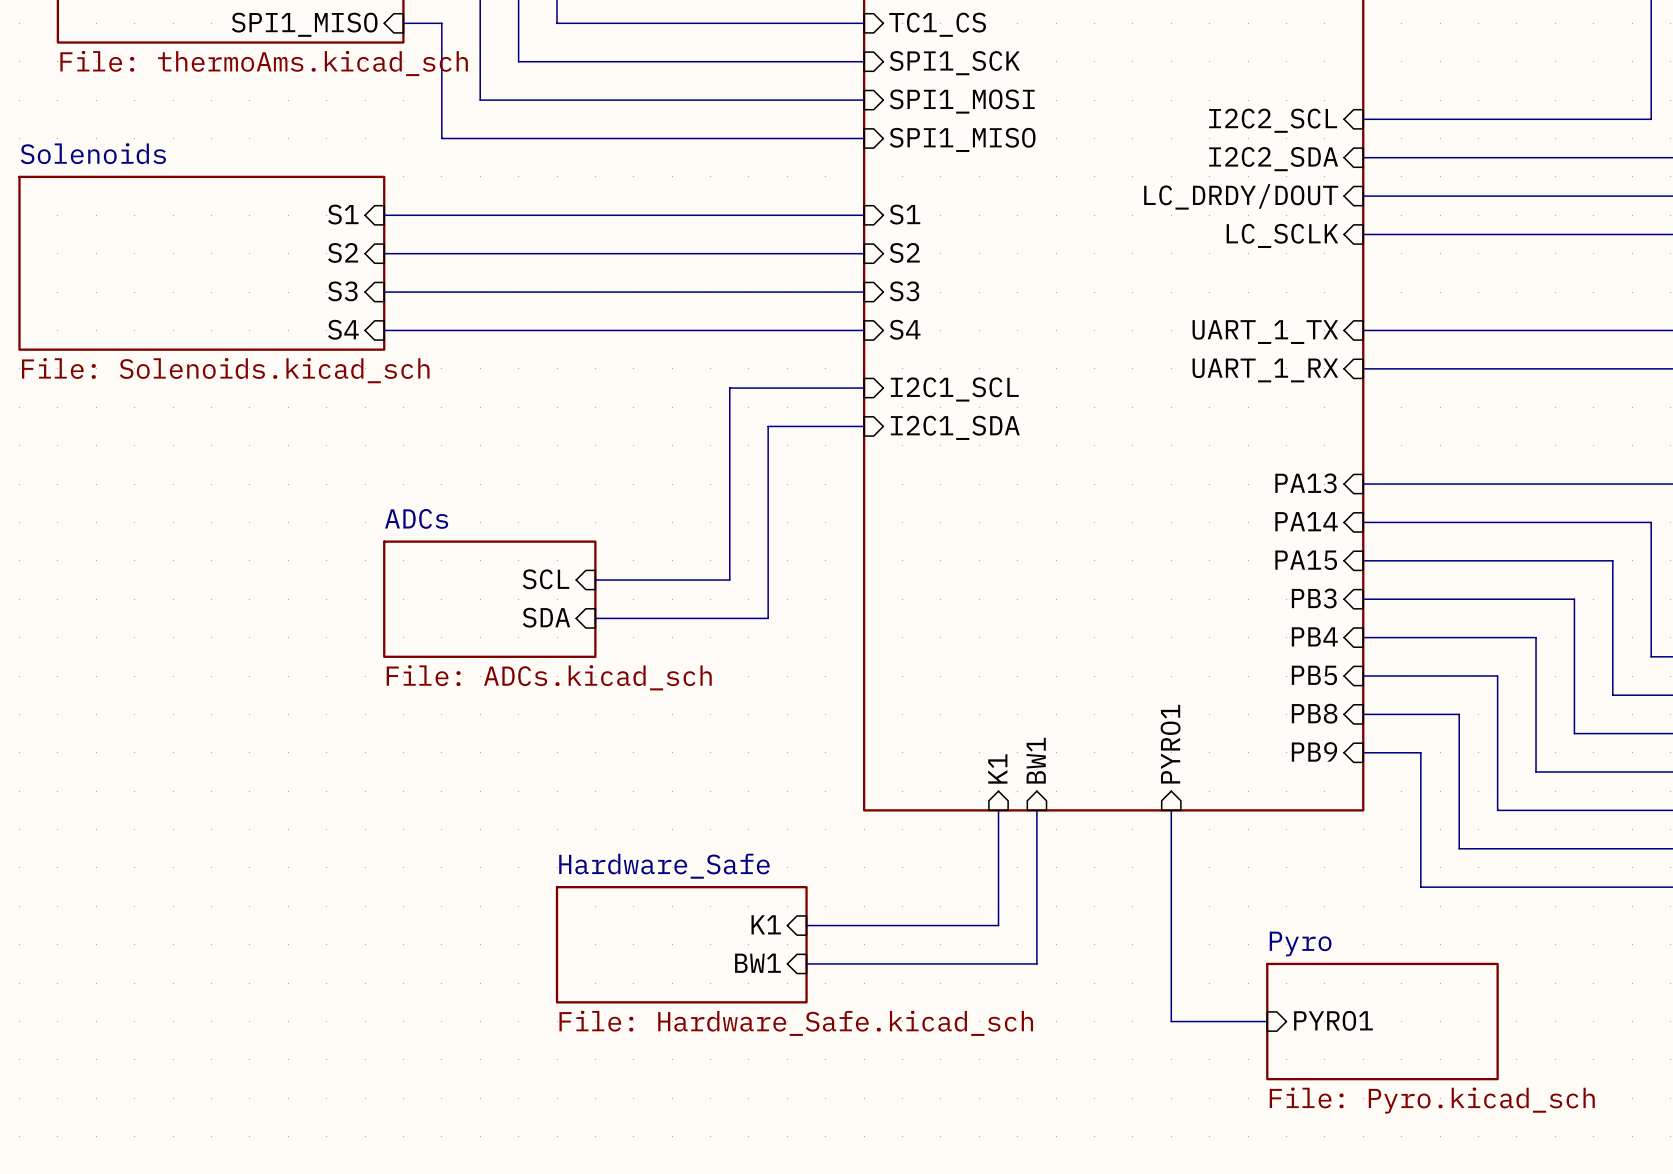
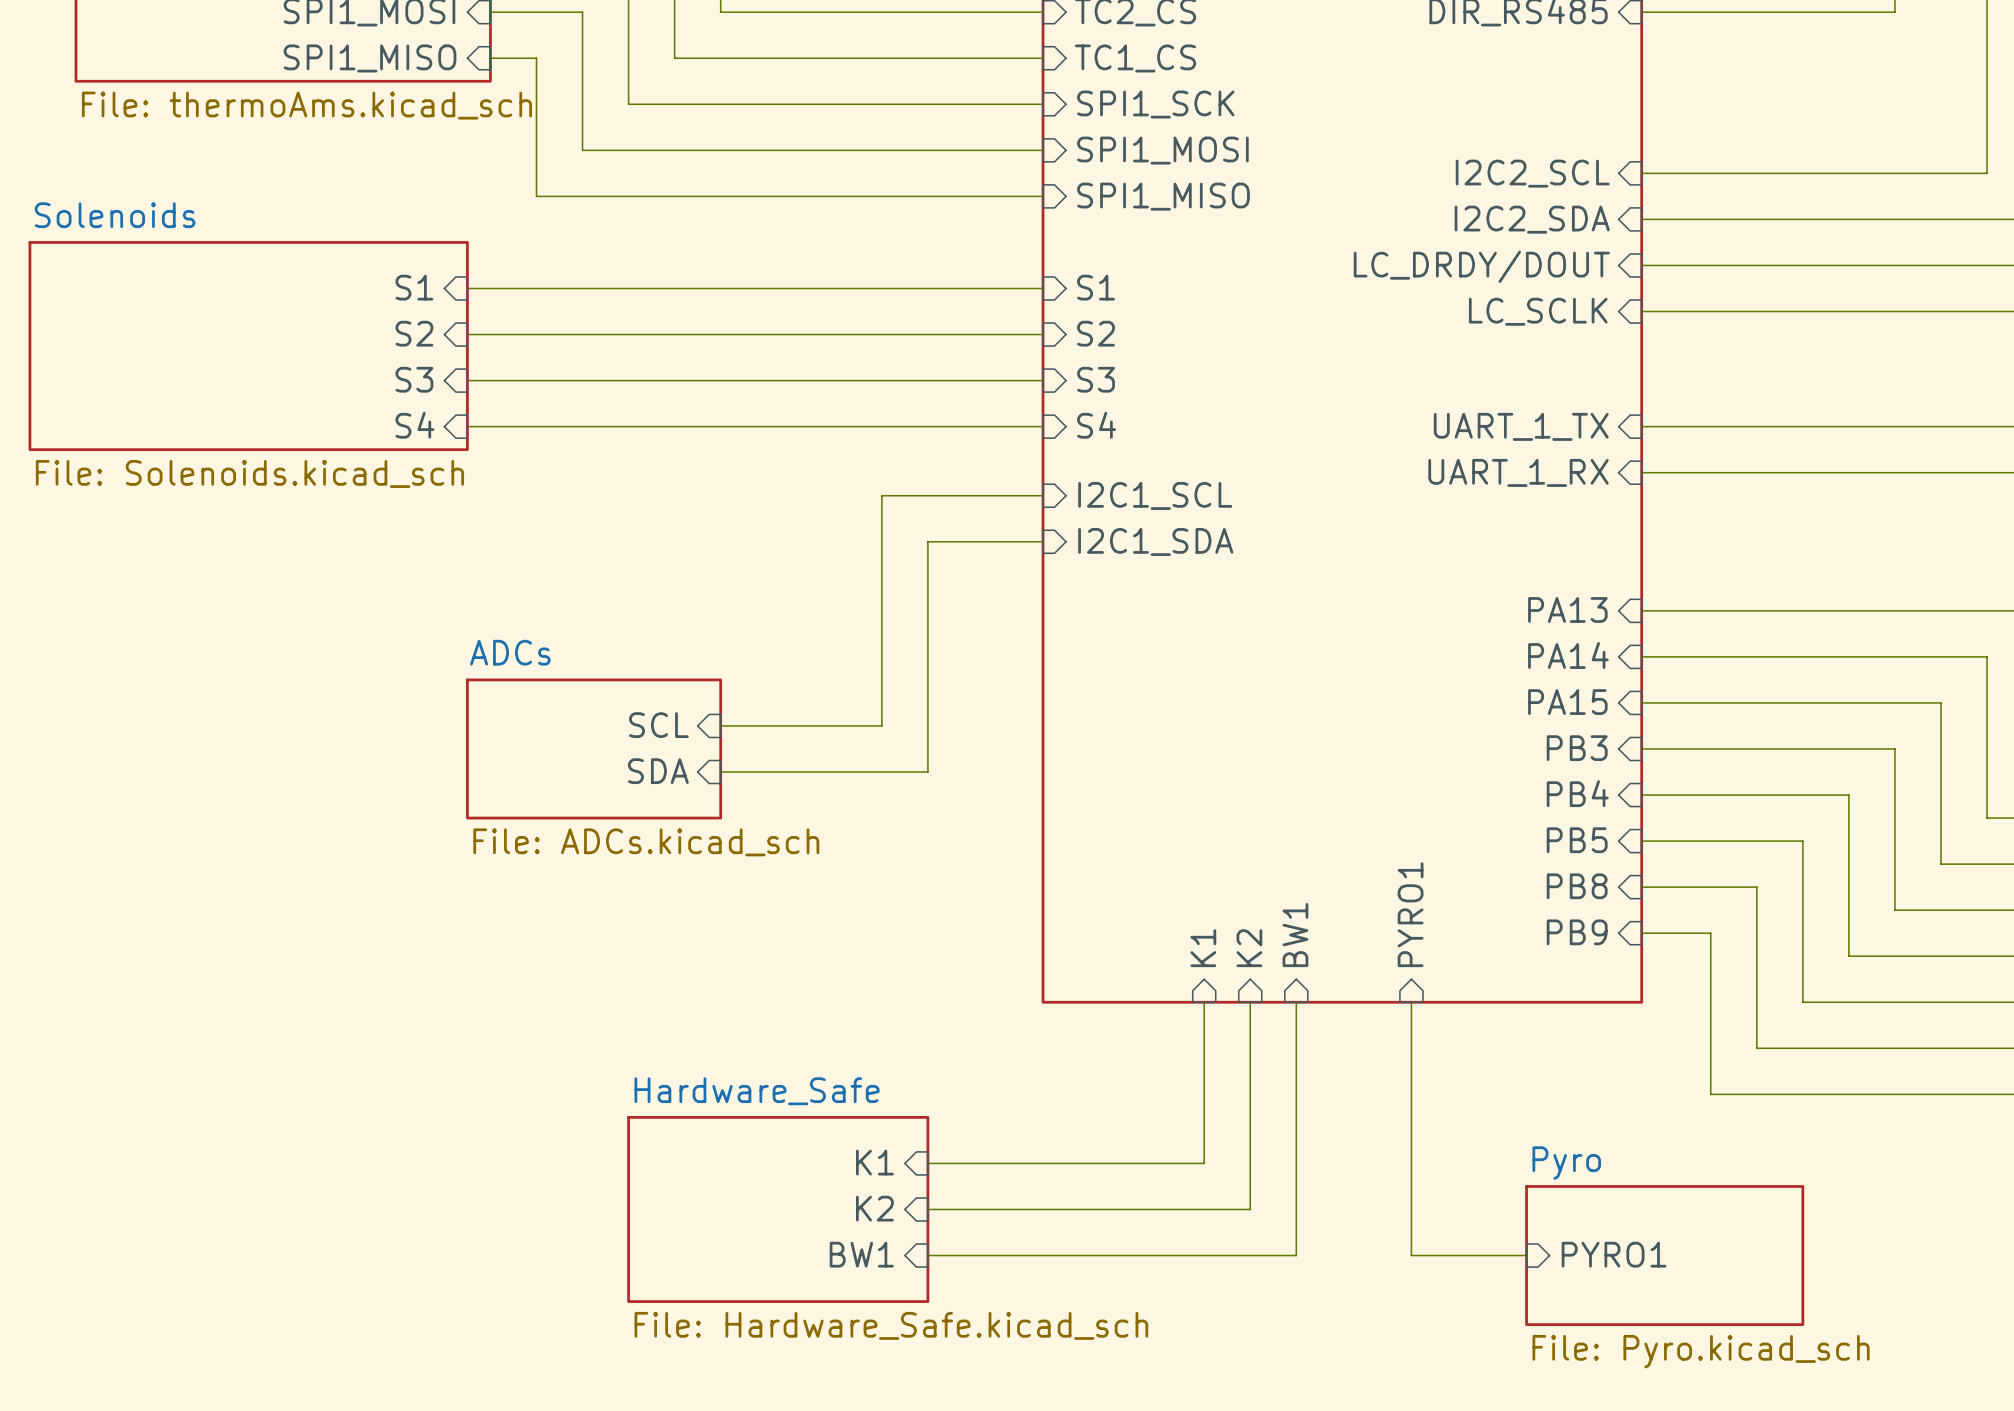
sheet pin: BW1 (1036, 760) -> K2 (1249, 948)
sheet pin: none -> BW1 (1295, 935)
wire: none -> (1296, 1002) (1296, 1255) (927, 1255)
sheet pin position: K1 (766, 924) -> K1 (874, 1162)
wire: (806, 925) (998, 925) -> (927, 1163) (1204, 1163) (1204, 1140)
sheet Hardware_Safe: File: Hardware_Safe.kicad_sch (681, 944) -> none
sheet pin position: BW1 (757, 963) -> BW1 (861, 1254)
wire: (806, 963) (1036, 963) -> (927, 1209) (1250, 1209) (1250, 1186)
sheet pin: none -> K2 (874, 1208)
sheet Hardware_Safe: none -> File: Hardware_Safe.kicad_sch (778, 1209)

